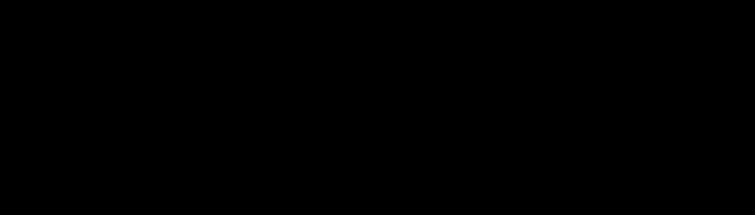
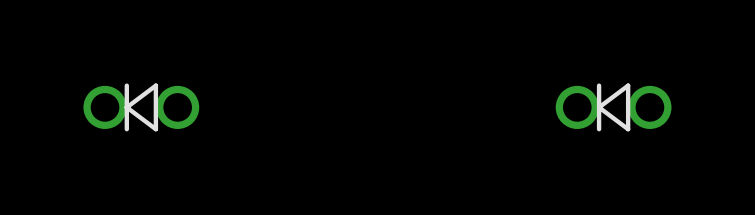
part: none -> (141, 107)
part: none -> (613, 107)

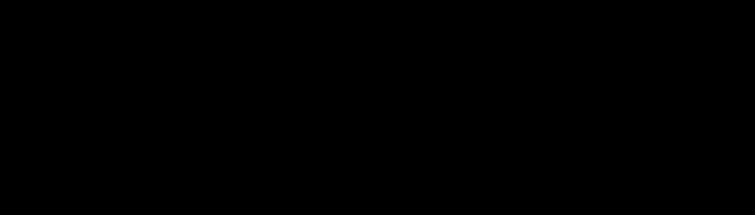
part: (141, 107) -> none
part: (613, 107) -> none

